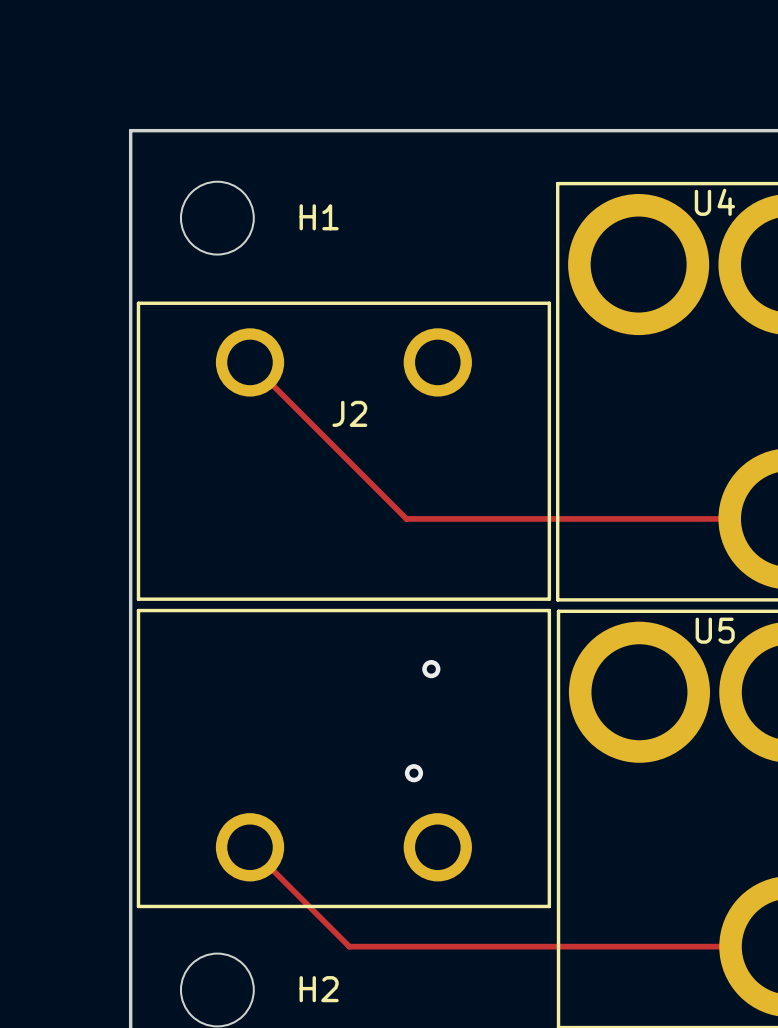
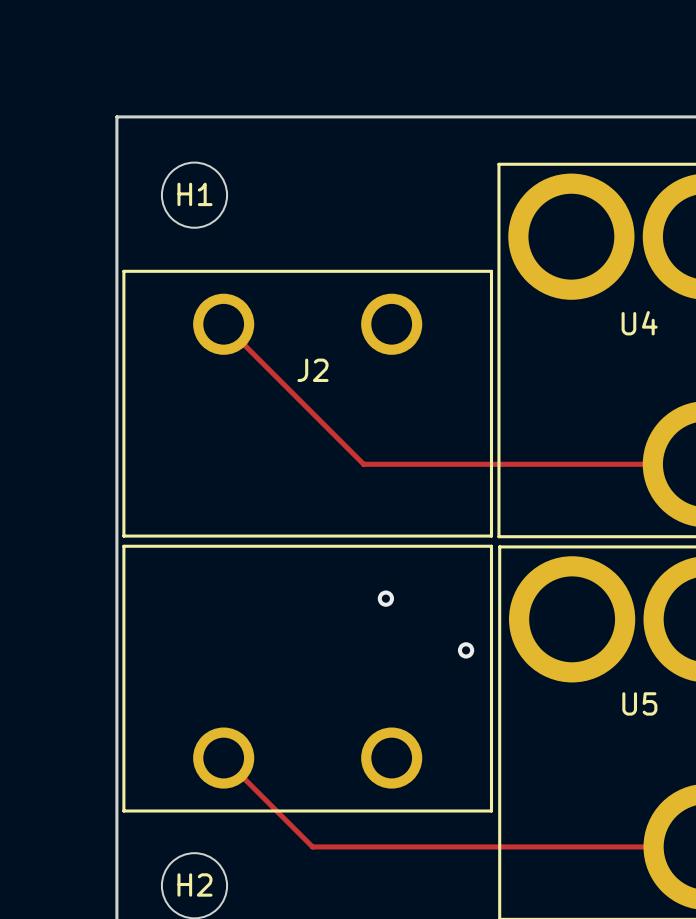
U4 name position: U4 (714, 202) -> U4 (639, 323)
H1 name position: H1 (319, 217) -> H1 (194, 194)
U5 name position: U5 (715, 630) -> U5 (639, 703)
via position: (413, 773) -> (466, 650)
H2 name position: H2 (319, 989) -> H2 (194, 884)

